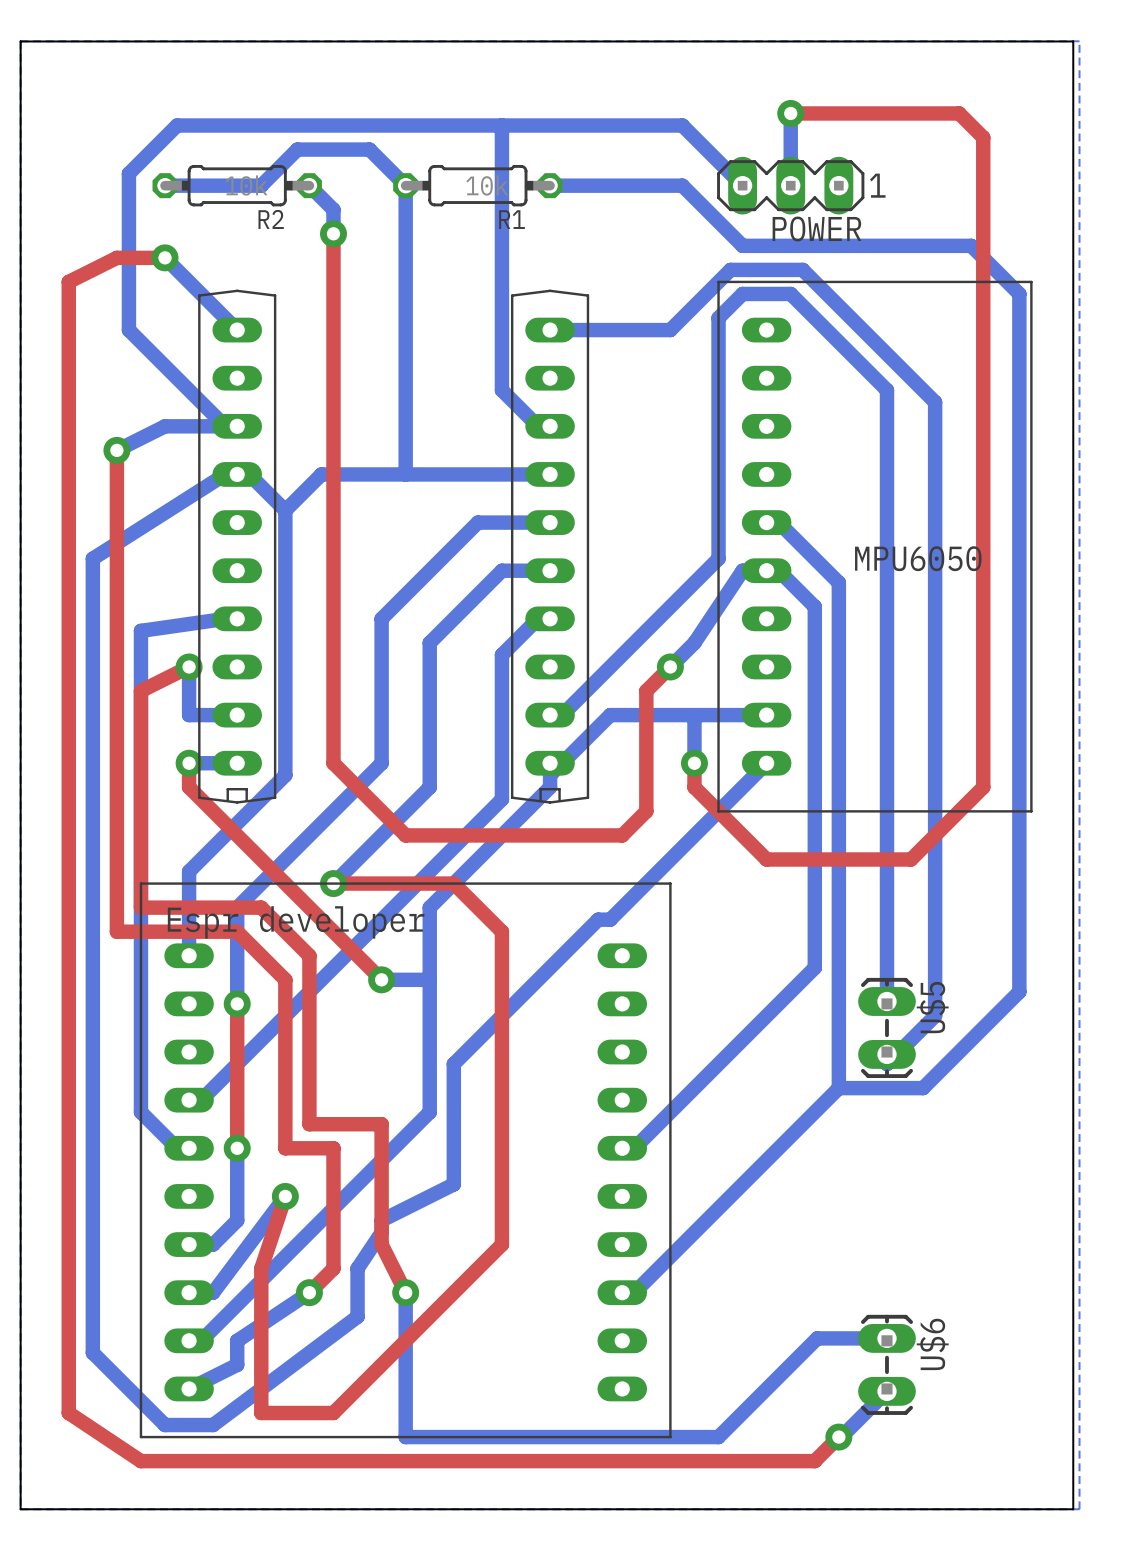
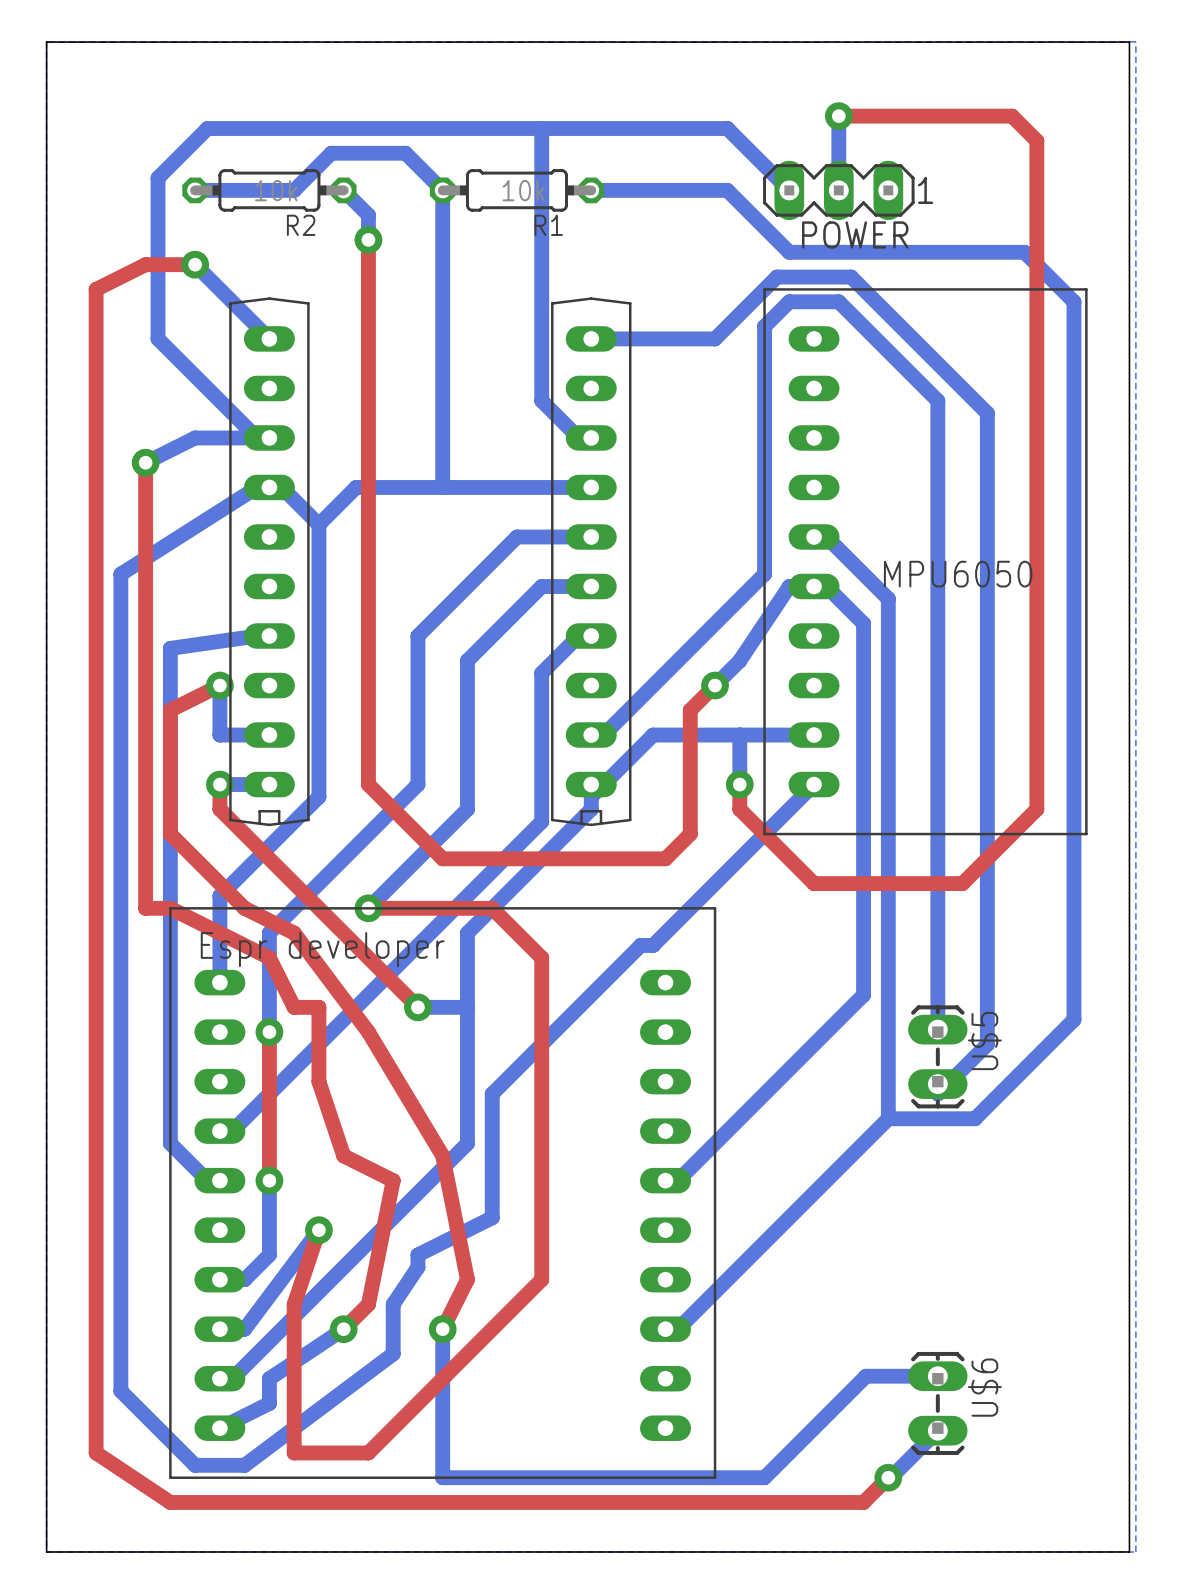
top track: (140, 811) (140, 907) (261, 907) (309, 955) (309, 1124) (381, 1124) (381, 1244) (405, 1292) -> (170, 834) (244, 908) (294, 933) (368, 1032) (442, 1155) (467, 1279) (442, 1329)
top track: (116, 883) (116, 931) (237, 931) (285, 979) -> (145, 908) (170, 908) (269, 957) (294, 1007) (318, 1007)
top track: (285, 1052) (285, 1148) (333, 1148) (333, 1268) -> (318, 1081) (343, 1155) (393, 1180) (368, 1304)

